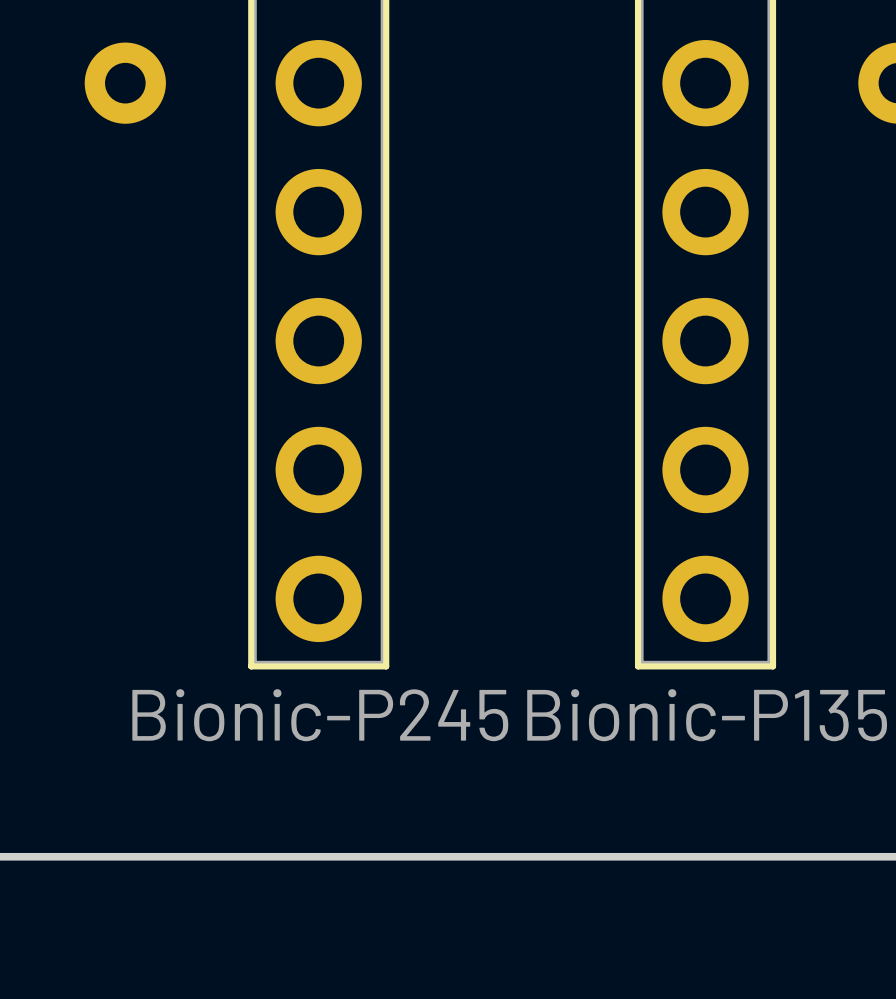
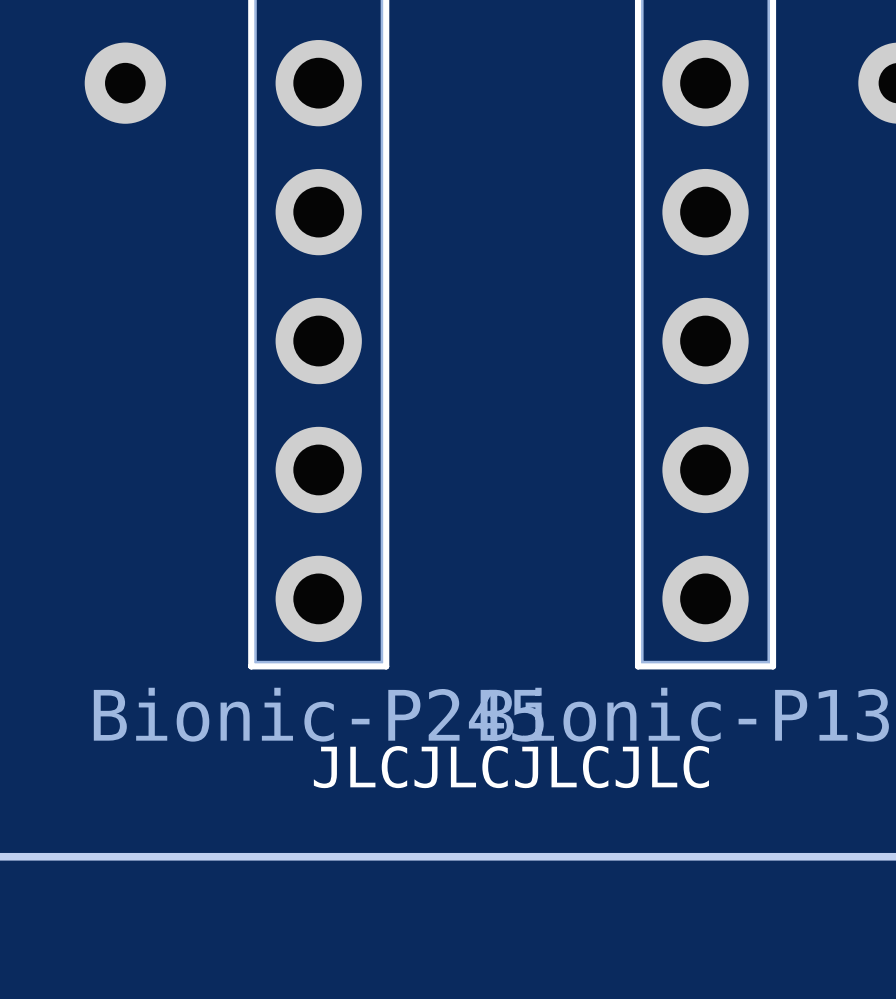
text: none -> JLCJLCJLCJLC (511, 767)

